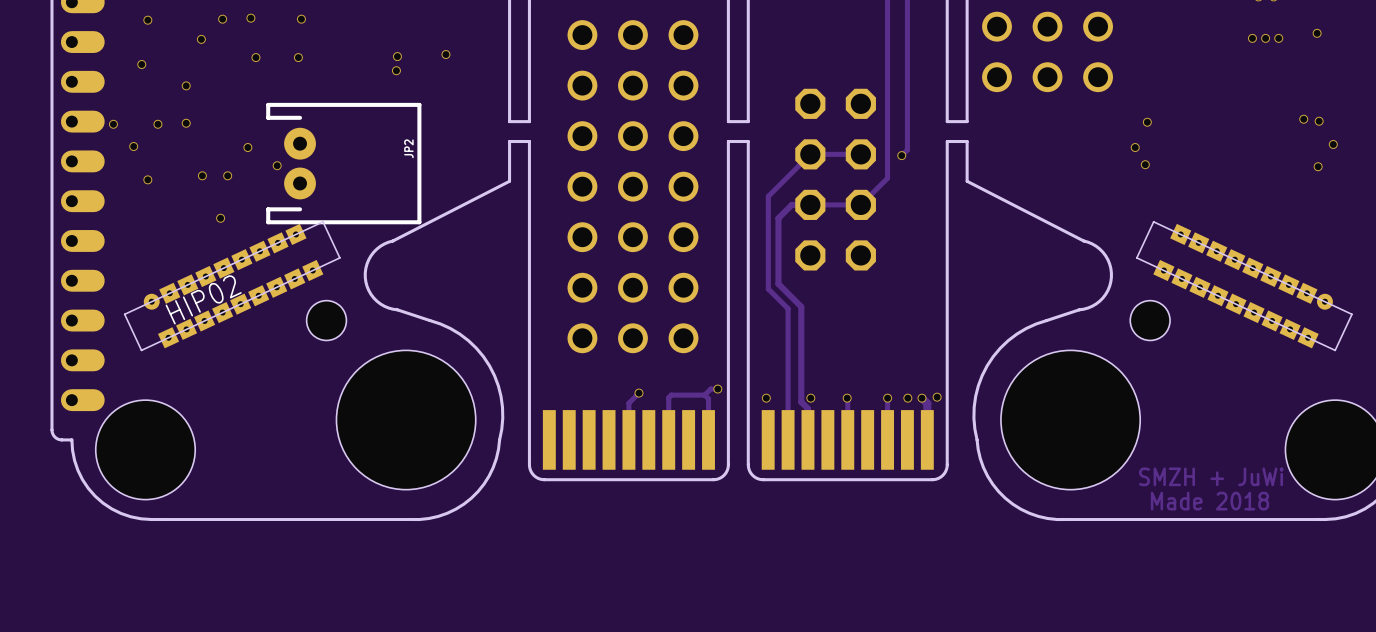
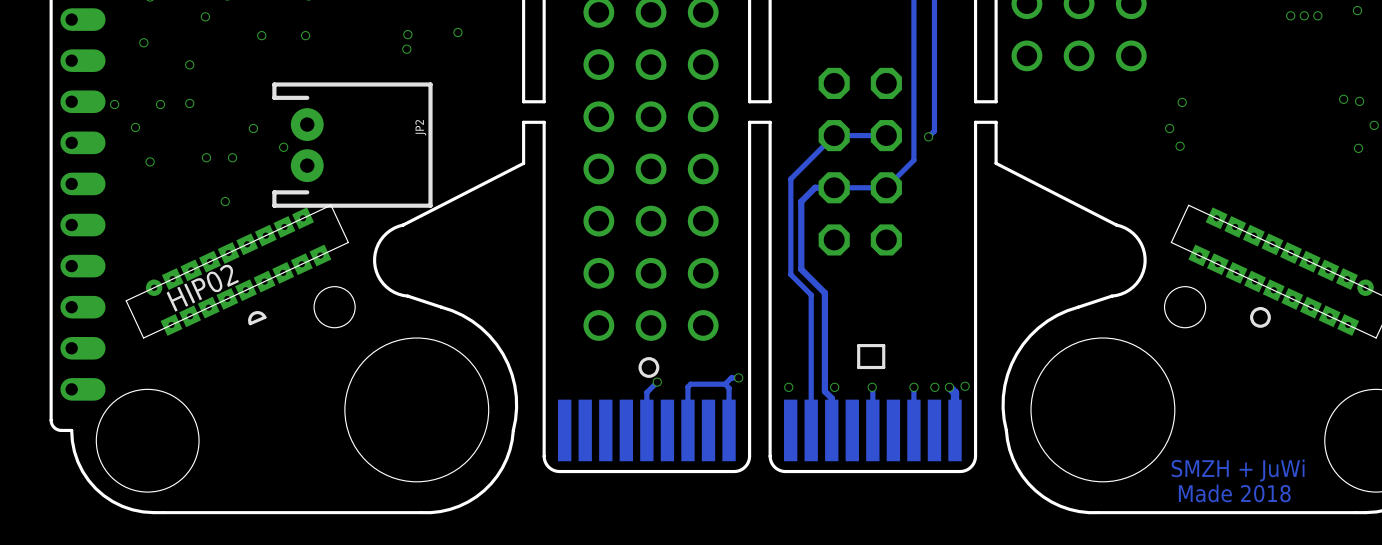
drawing: none -> [1250, 306, 1271, 328]
line: none -> (264, 317) (250, 323) (250, 317) (254, 313) (260, 313) (264, 317)
line: none -> (883, 345) (883, 367) (858, 367) (858, 345) (883, 345)
drawing: none -> [638, 357, 660, 378]

